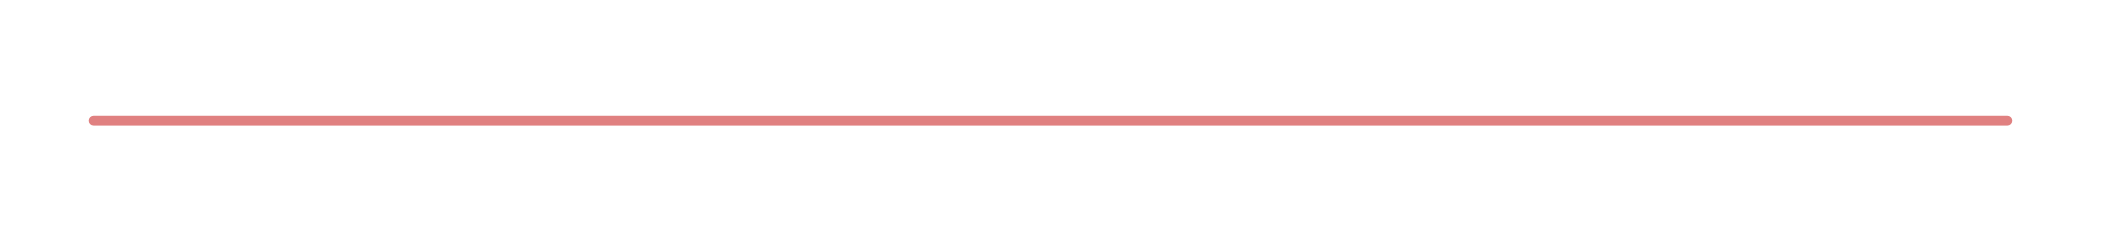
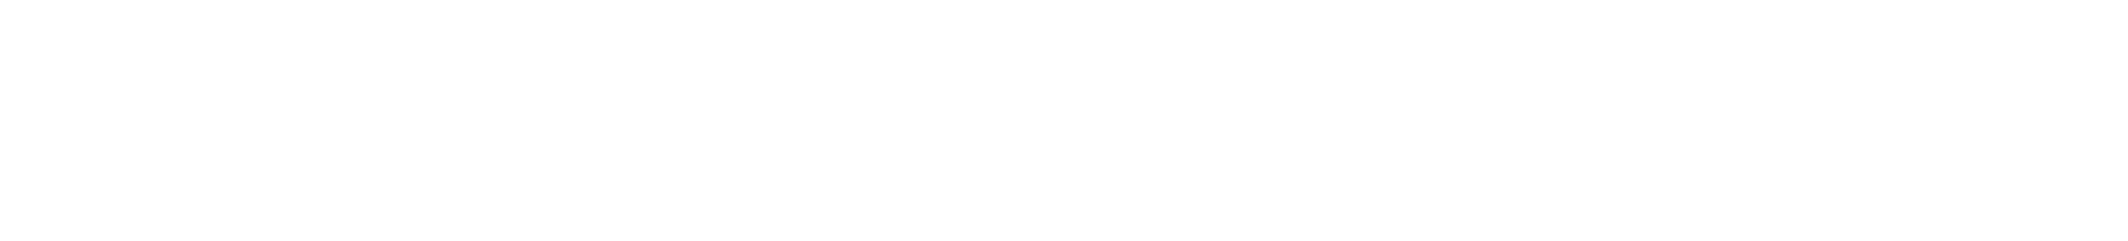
track: (93, 120) (2007, 120) -> none

